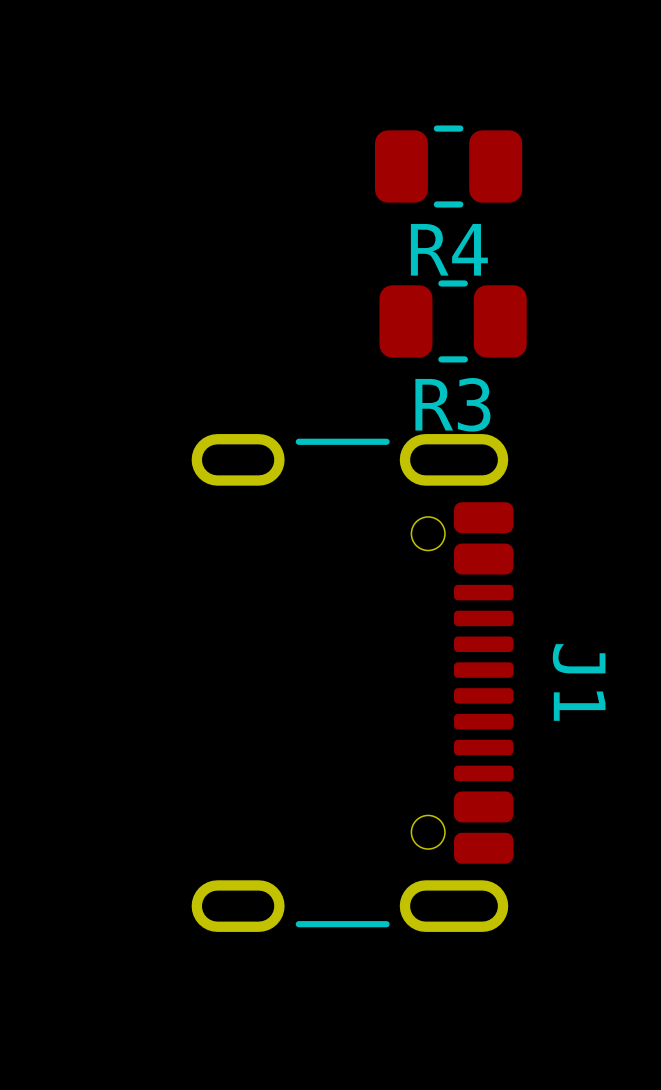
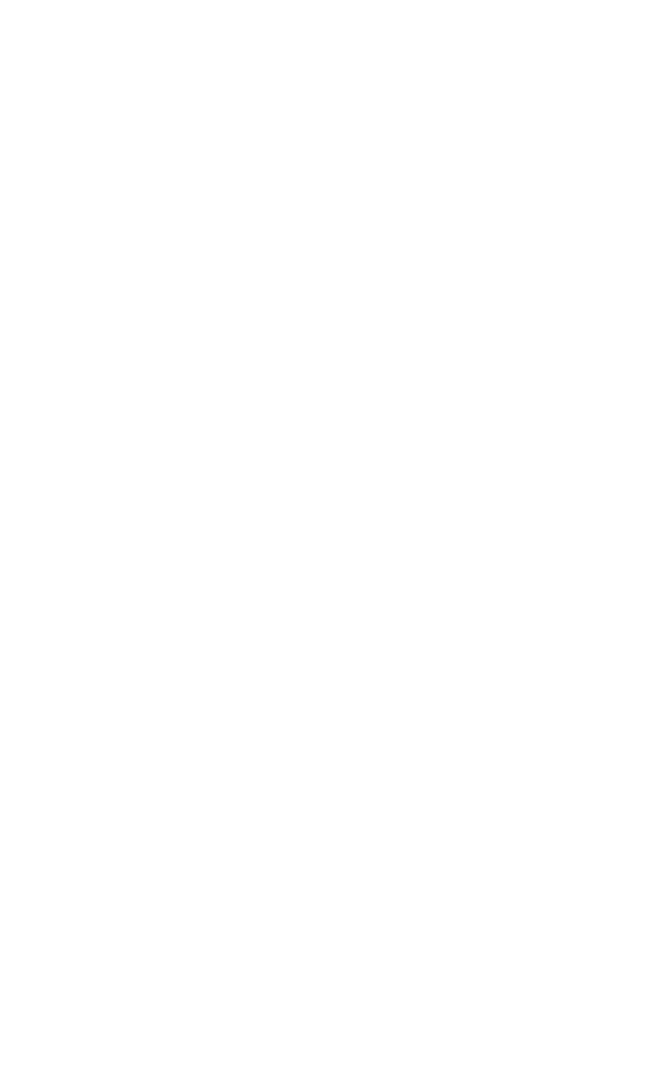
R4: (448, 166) -> none
R3: (453, 321) -> none
J1: (352, 682) -> none

